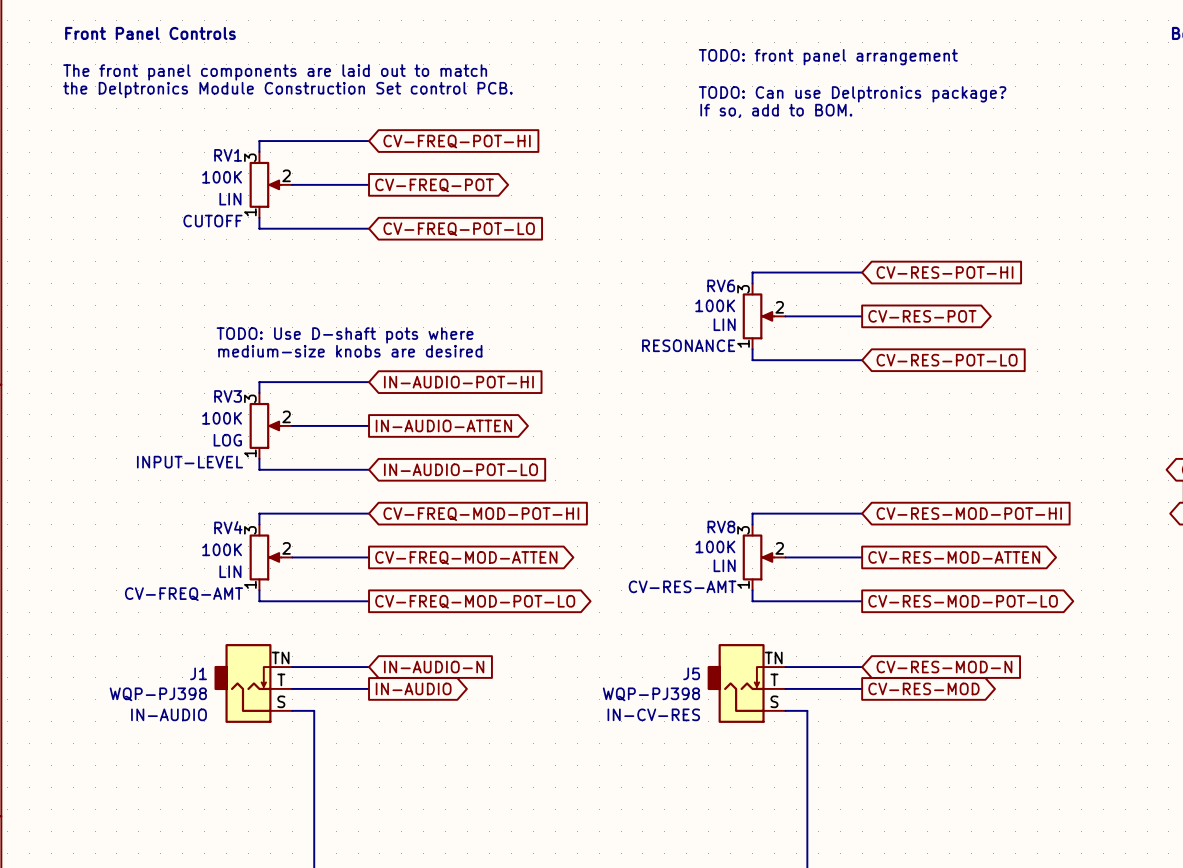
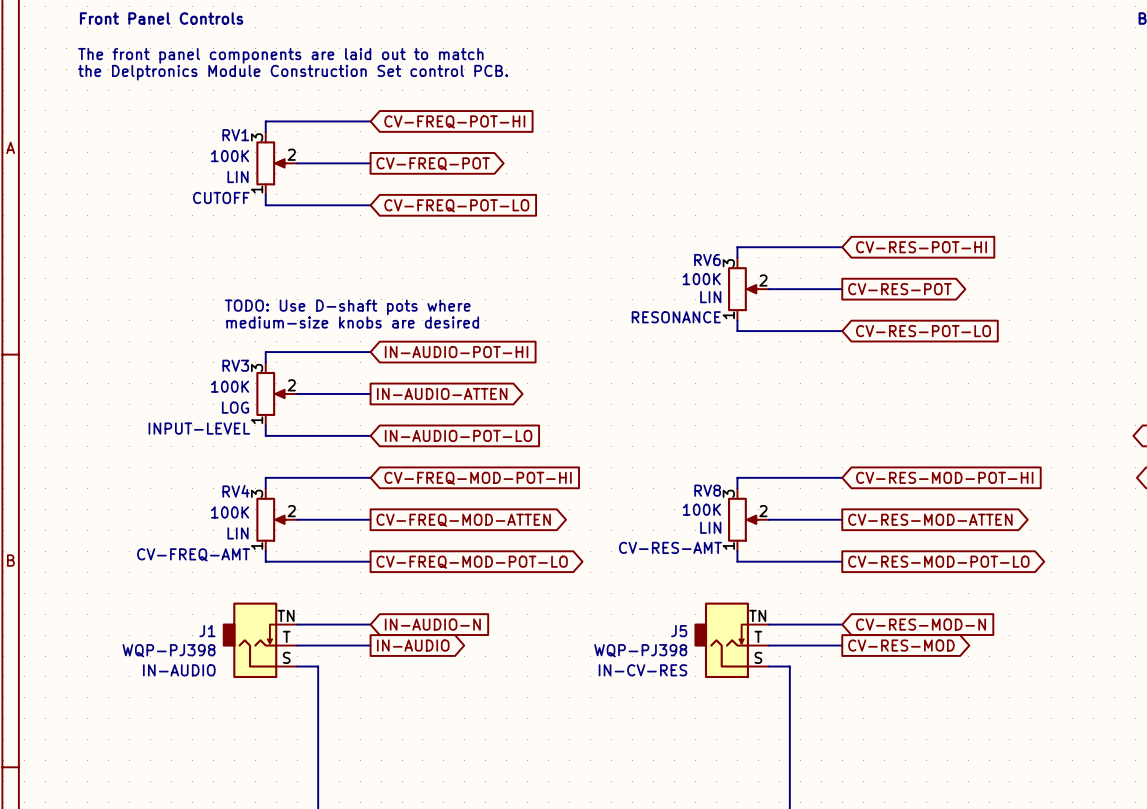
text: TODO: front panel arrangement (828, 57) -> none
text: TODO: Can use Delptronics package? (852, 94) -> none
text: If so, add to BOM. (776, 110) -> none

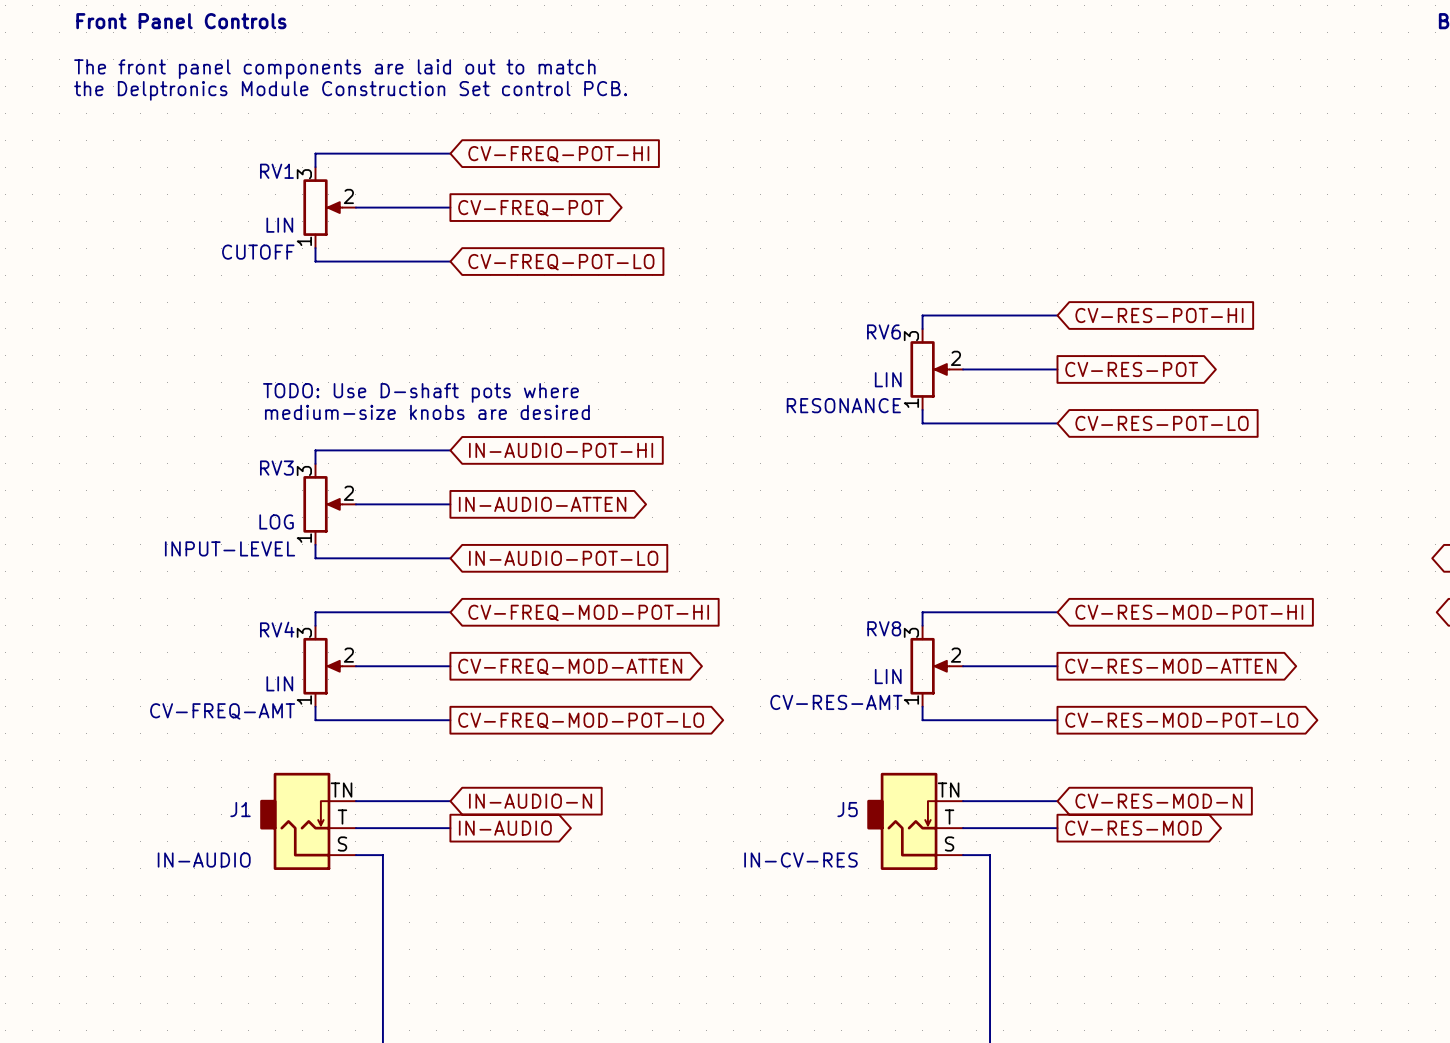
RV1 value: 100K (230, 156) -> none
RV6 value: 100K (701, 279) -> none
RV3 value: 100K (230, 386) -> none
RV8 value: 100K (701, 509) -> none
RV4 value: 100K (230, 512) -> none
J1 value: WQP-PJ398 (169, 650) -> none
J5 value: WQP-PJ398 (640, 650) -> none

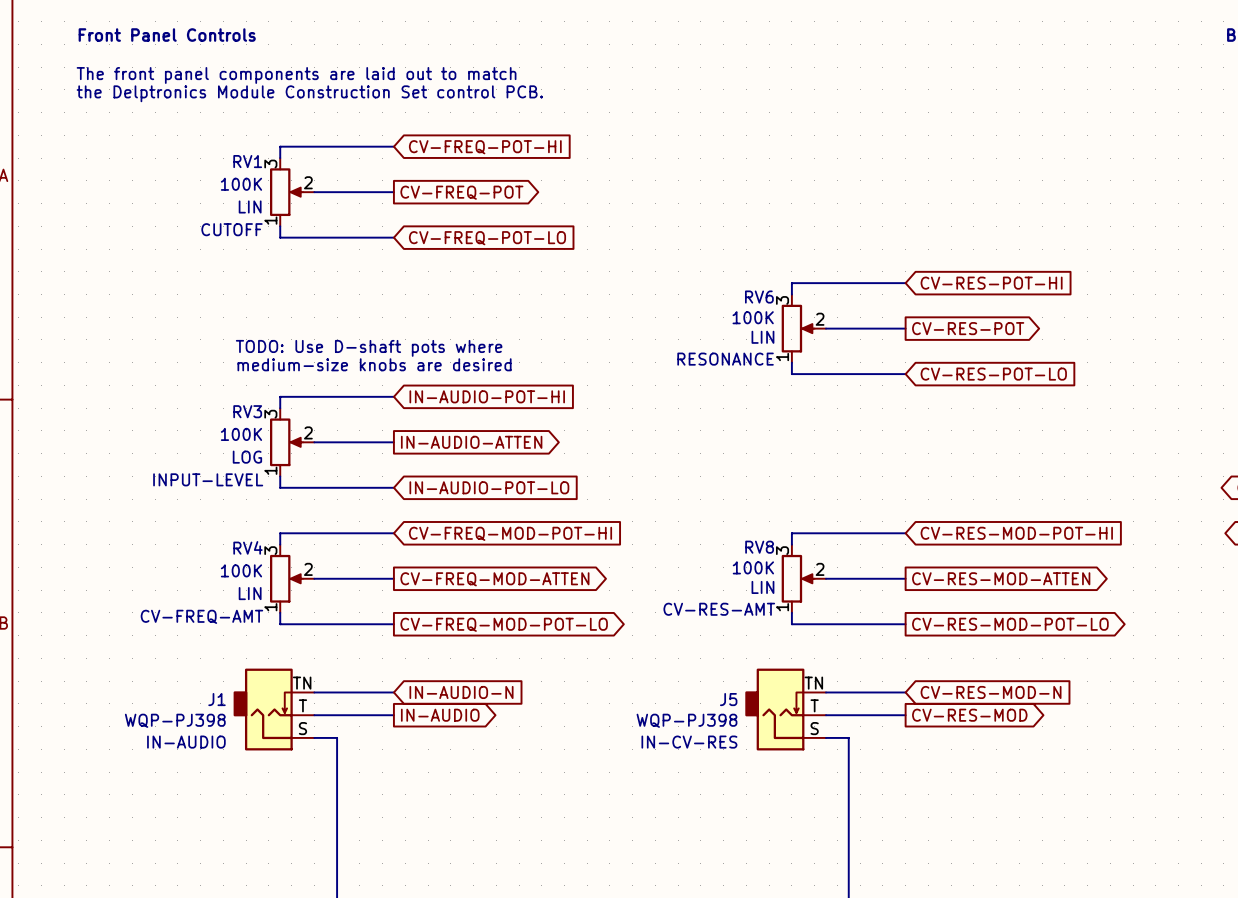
RV1 value: none -> 100K (241, 184)
RV6 value: none -> 100K (753, 317)
RV3 value: none -> 100K (241, 434)
RV8 value: none -> 100K (753, 567)
RV4 value: none -> 100K (241, 570)
J1 value: none -> WQP-PJ398 (175, 720)
J5 value: none -> WQP-PJ398 (686, 720)

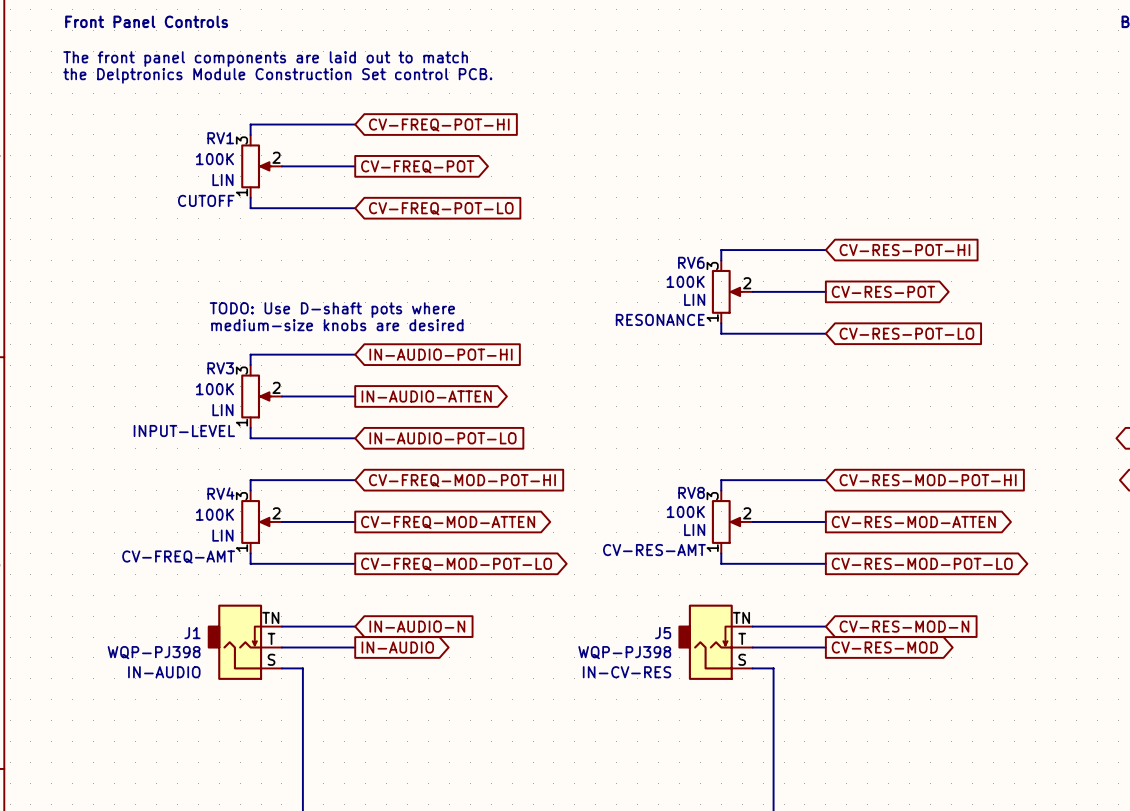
RV3 text: LOG (247, 457) -> LIN (222, 410)

